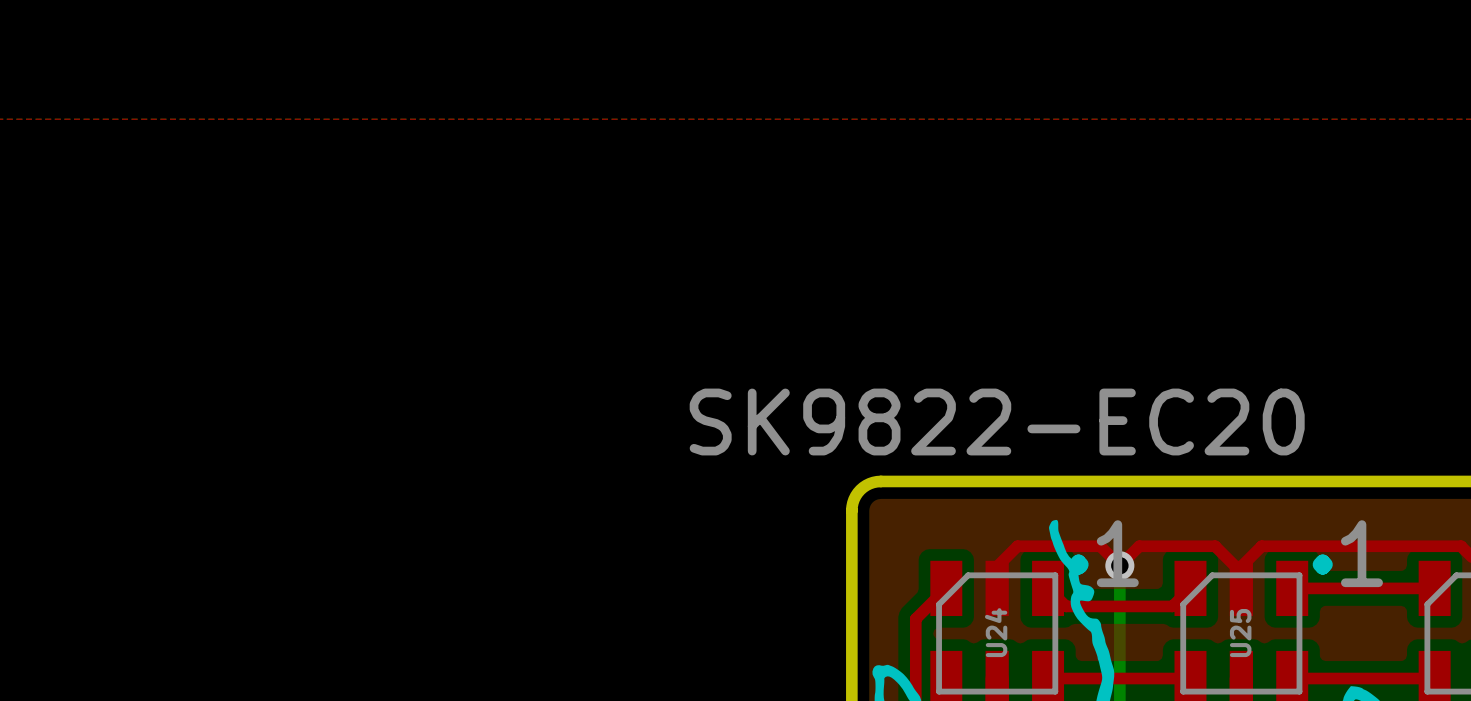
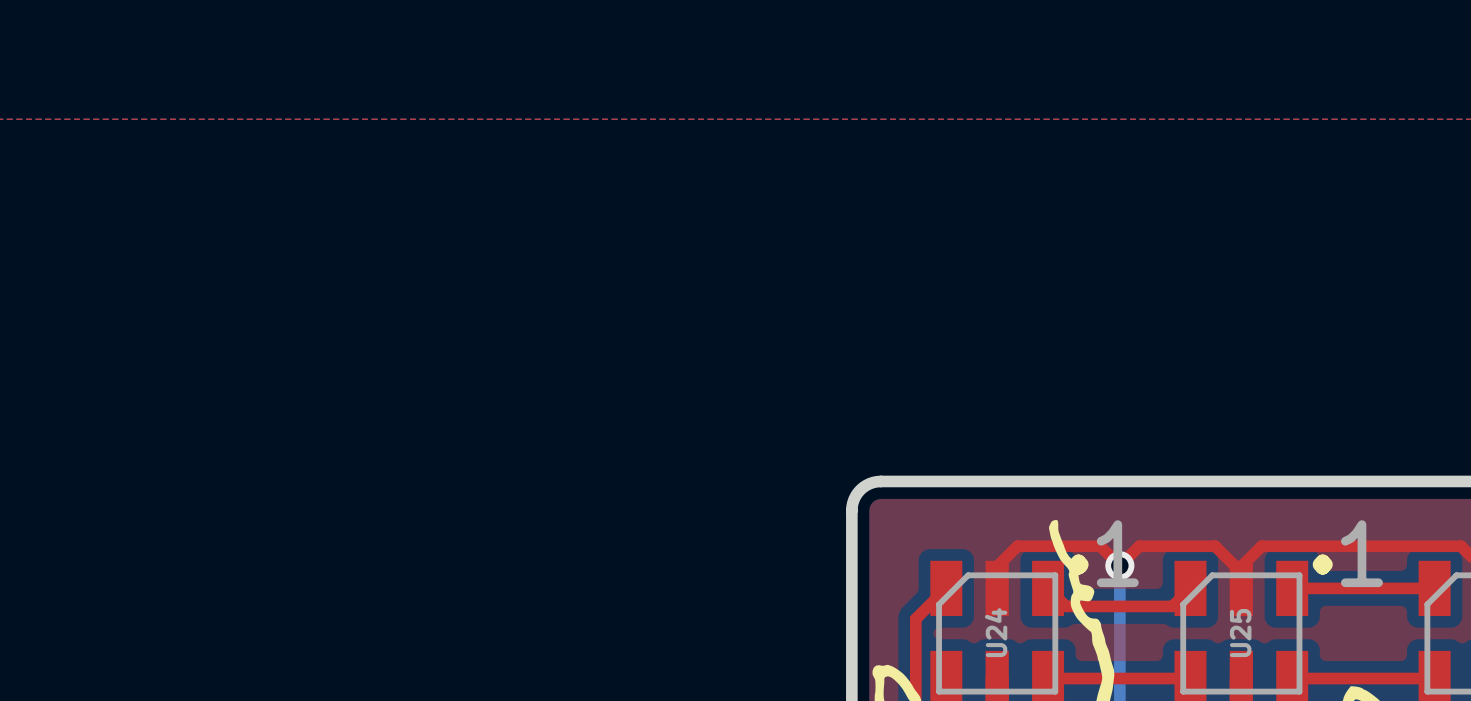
U24 value: SK9822-EC20 (997, 422) -> none

